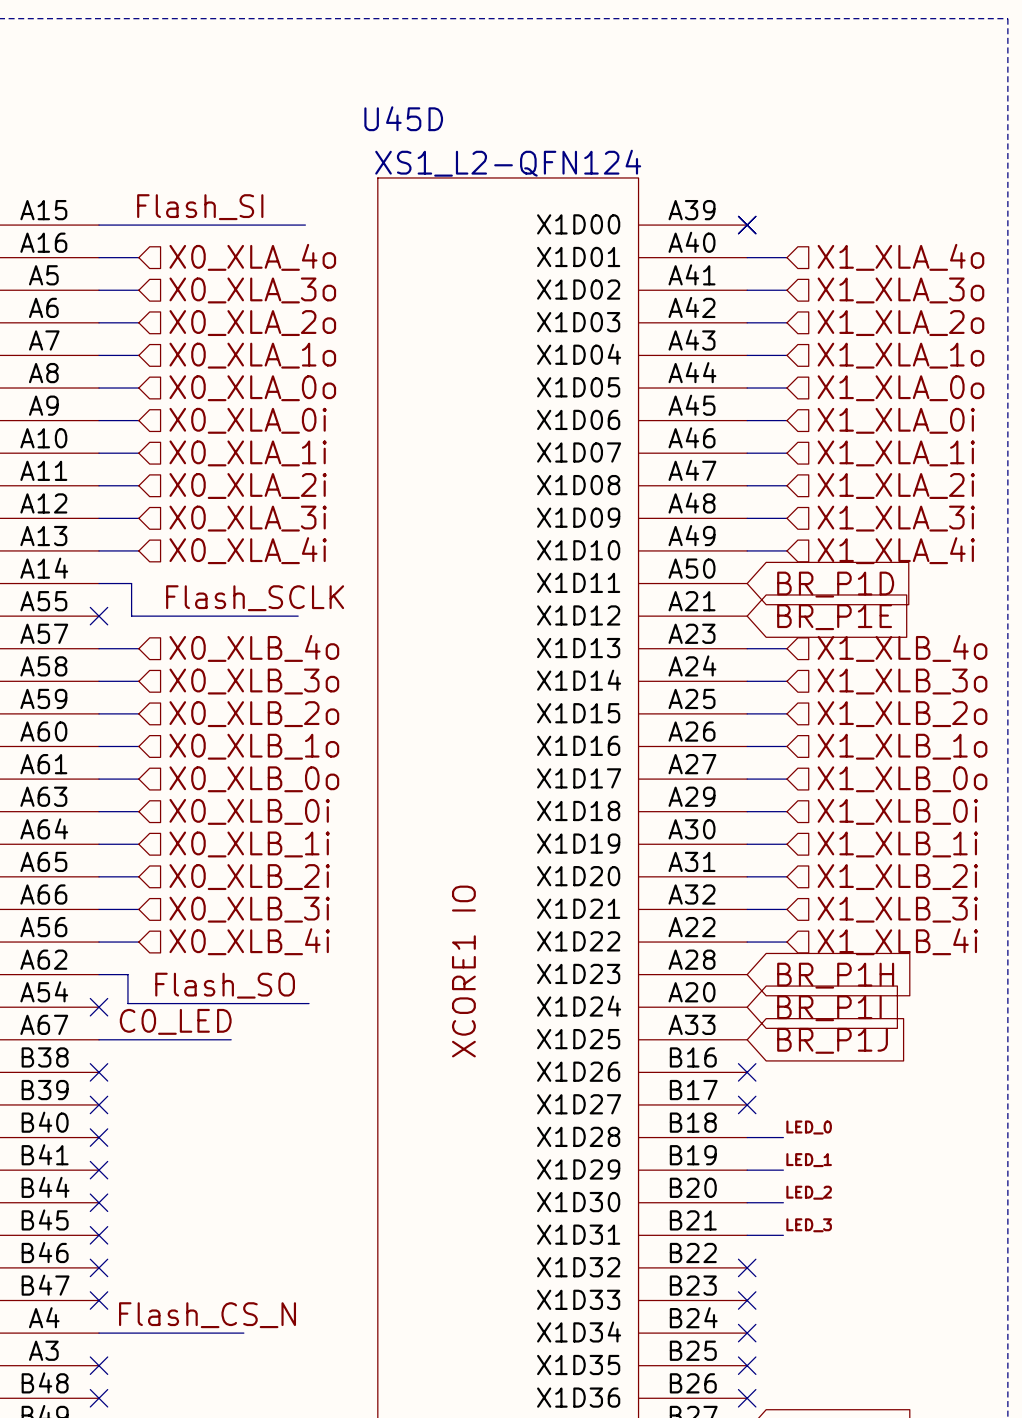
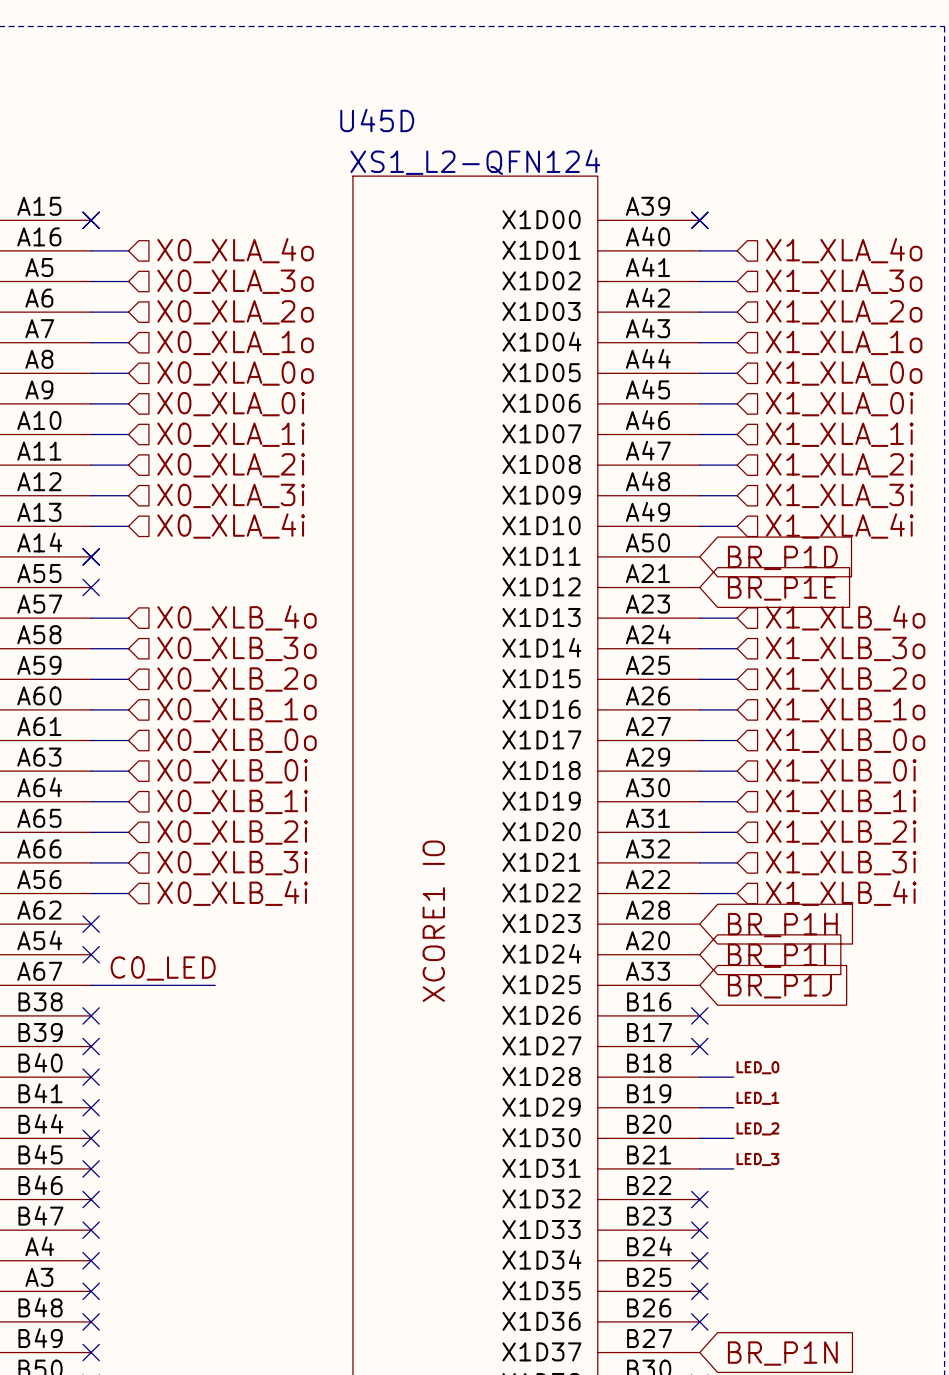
label: Flash_SI (200, 207) -> none
wire: (99, 225) (305, 225) -> none
no-connect mark: none -> (91, 220)
wire: (99, 583) (131, 583) (131, 616) (298, 616) -> none
no-connect mark: none -> (91, 556)
label: Flash_SCLK (255, 598) -> none
wire: (99, 974) (127, 974) (127, 1003) (309, 1003) -> none
no-connect mark: none -> (91, 924)
label: Flash_SO (225, 985) -> none
label: Flash_CS_N (207, 1315) -> none
wire: (99, 1333) (243, 1333) -> none
no-connect mark: none -> (91, 1260)

